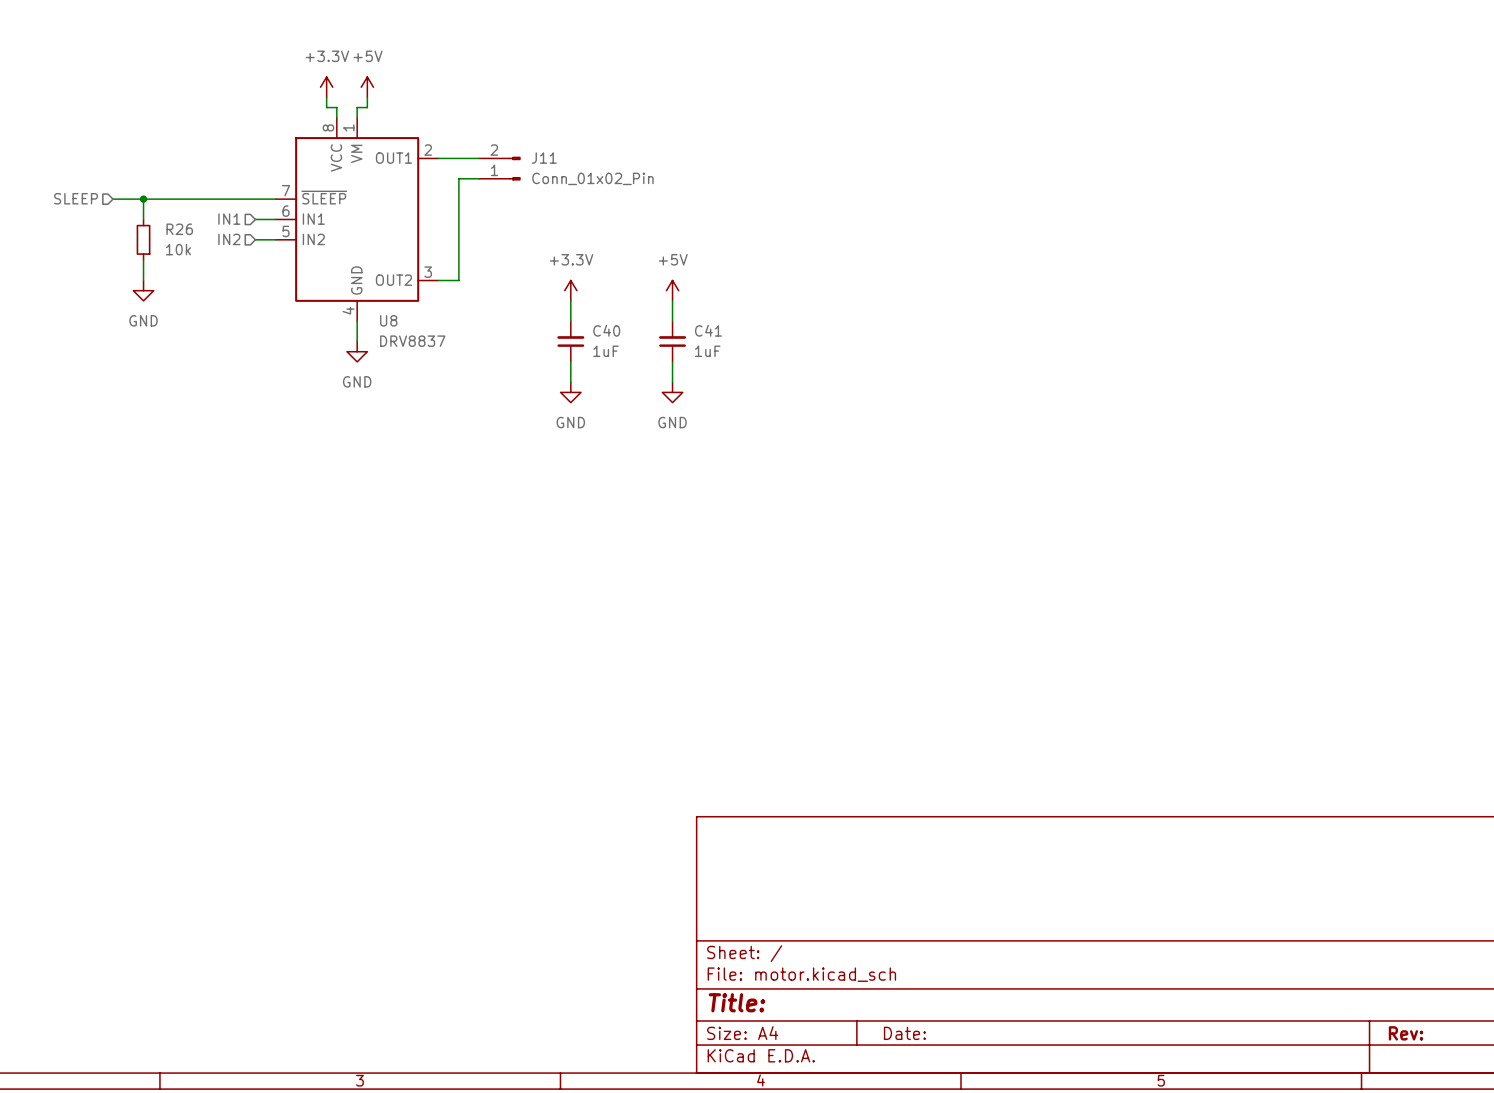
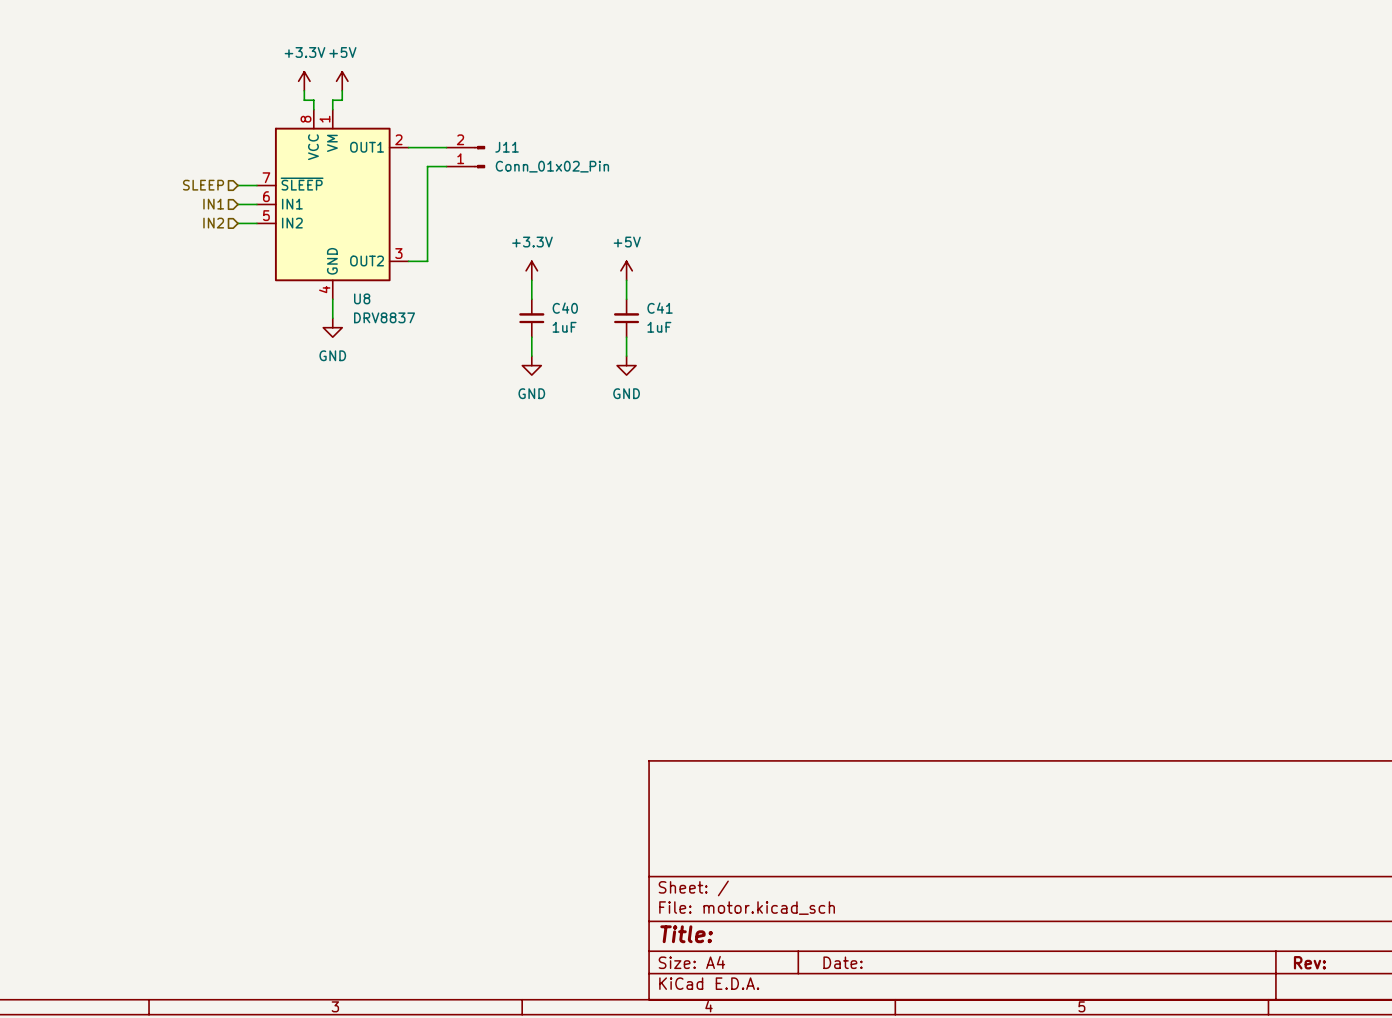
hierarchical label position: SLEEP (76, 198) -> SLEEP (203, 185)
wire: (113, 199) (255, 199) -> none
wire: (143, 199) (143, 219) -> none
junction: (143, 199) -> none
R26: 10k (143, 239) -> none
wire: (143, 260) (143, 280) -> none
power symbol: GND (143, 290) -> none

